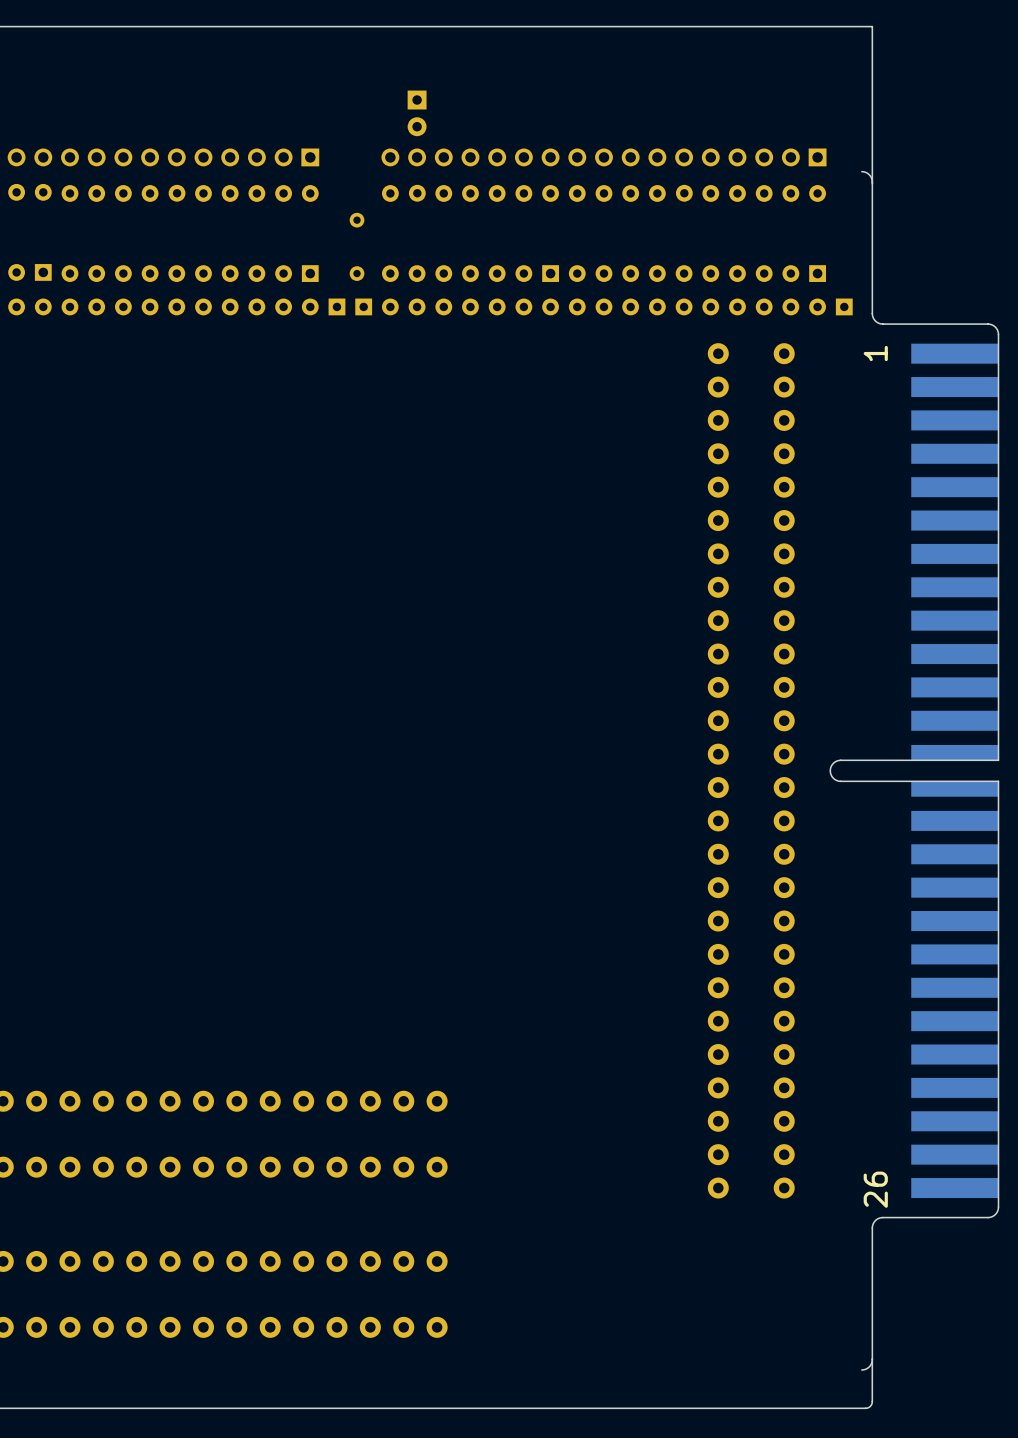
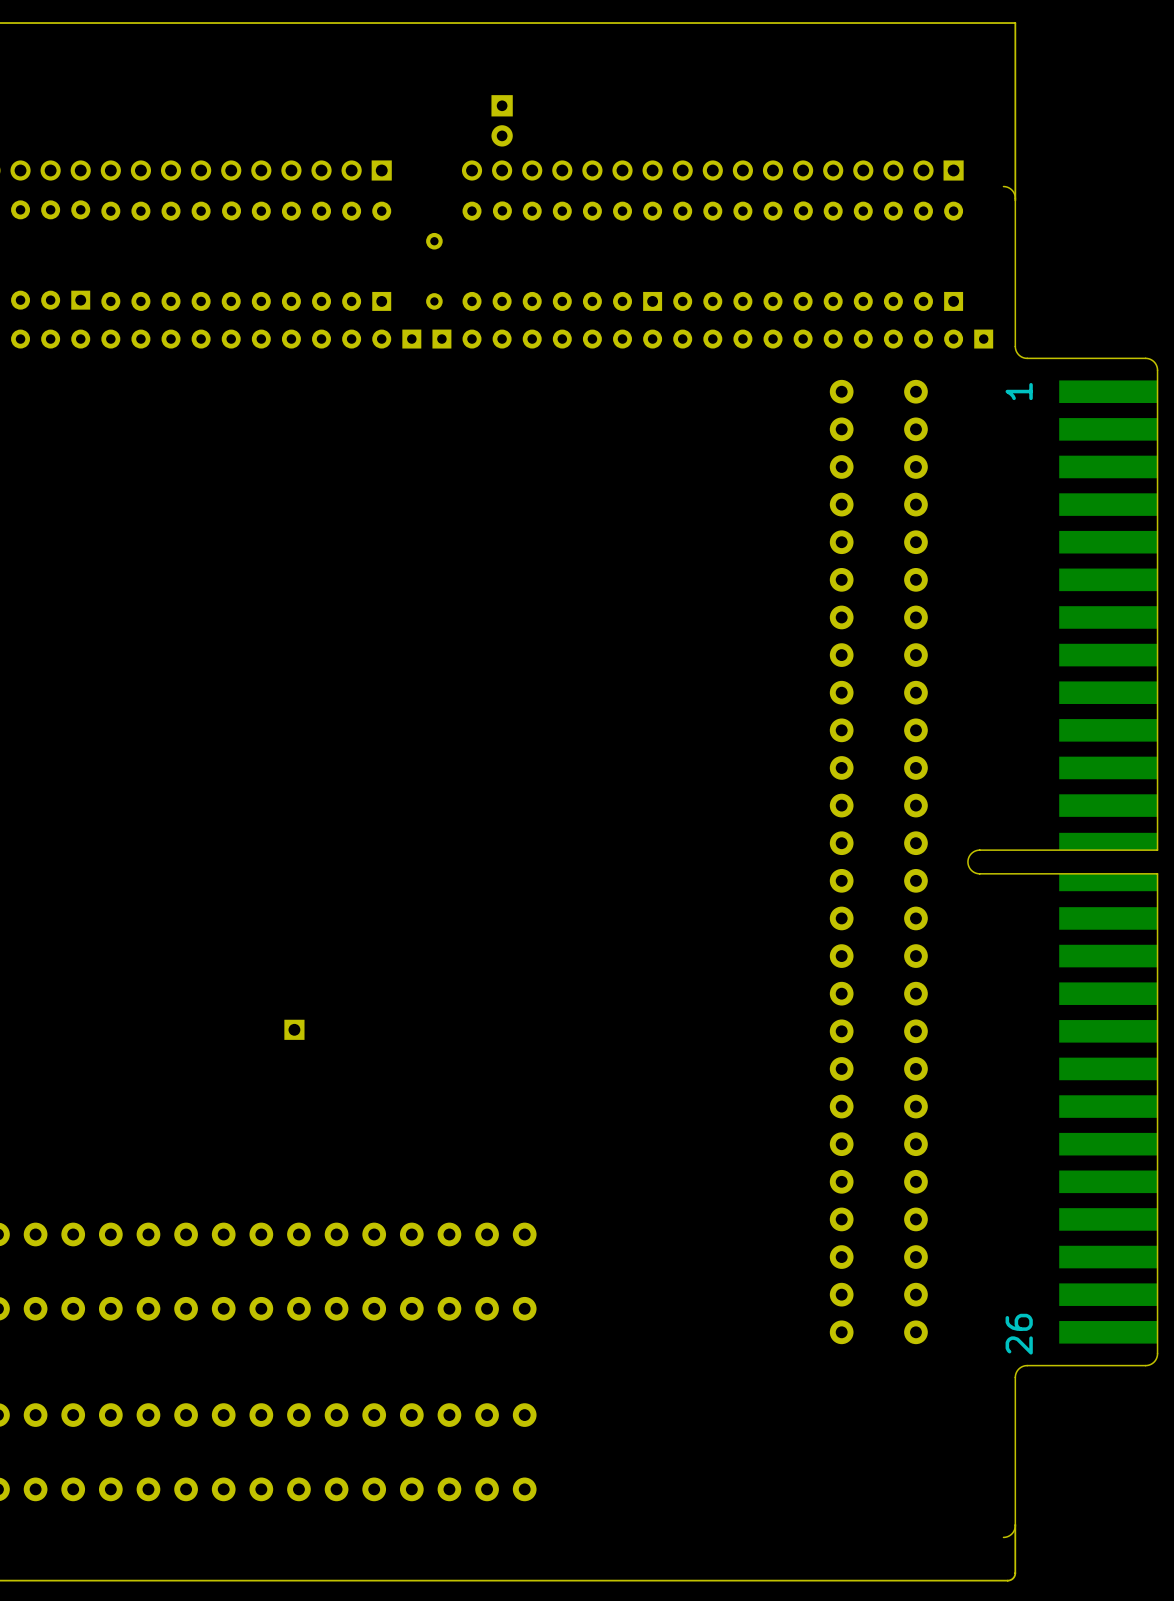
part: none -> (294, 1029)

